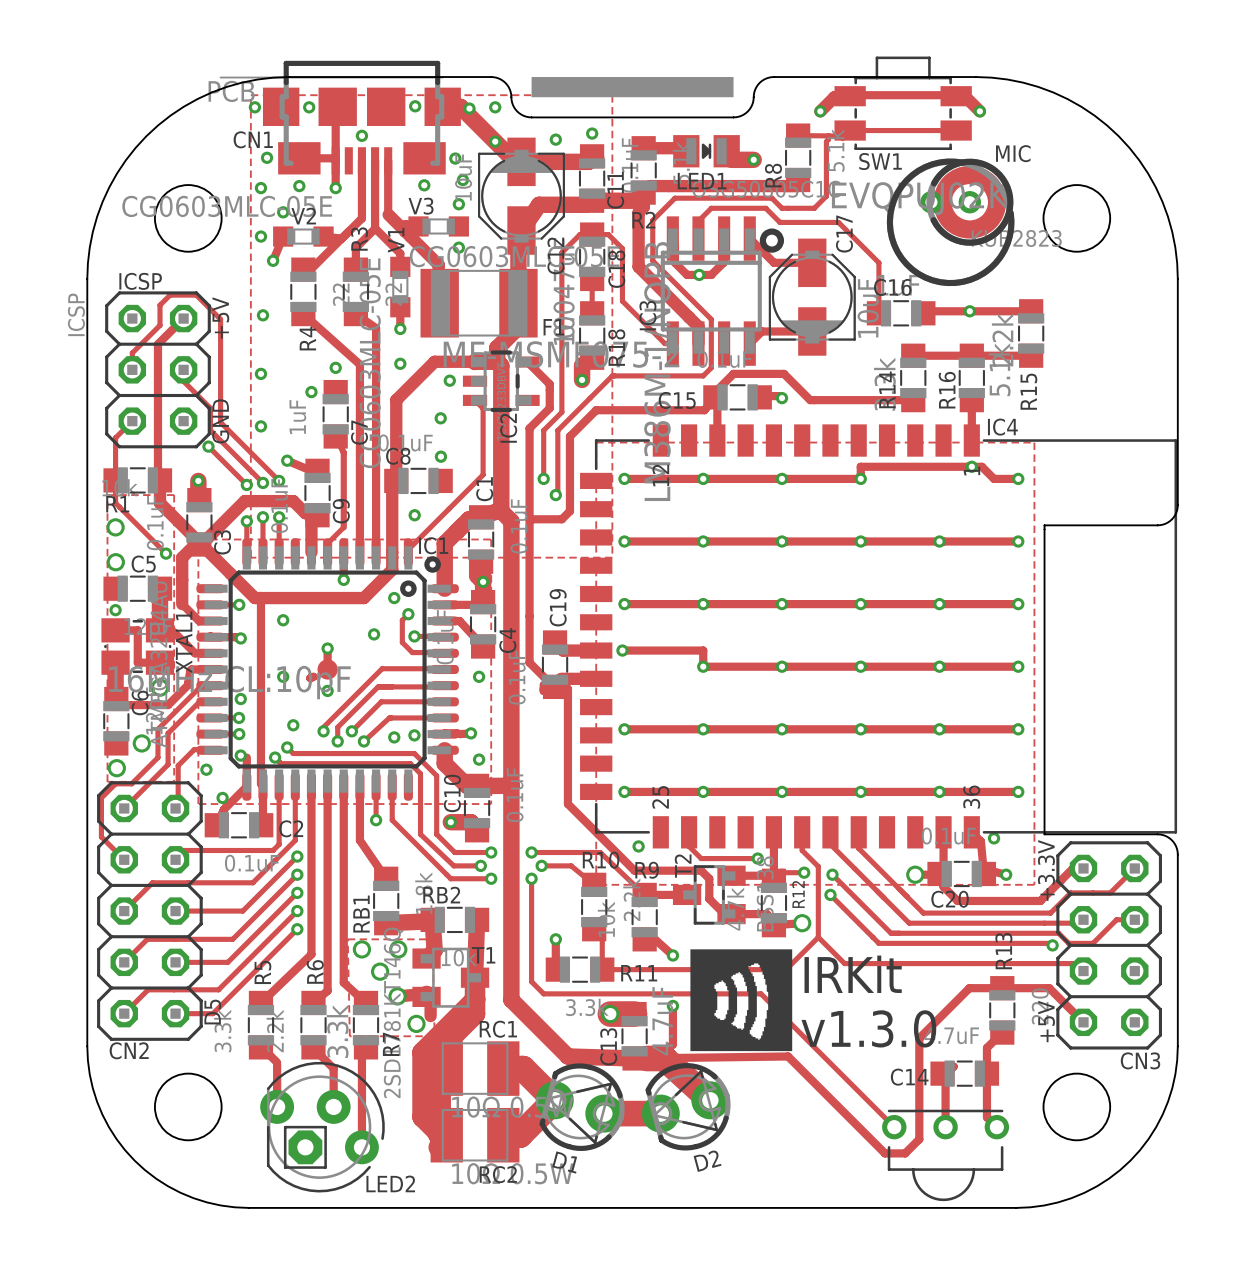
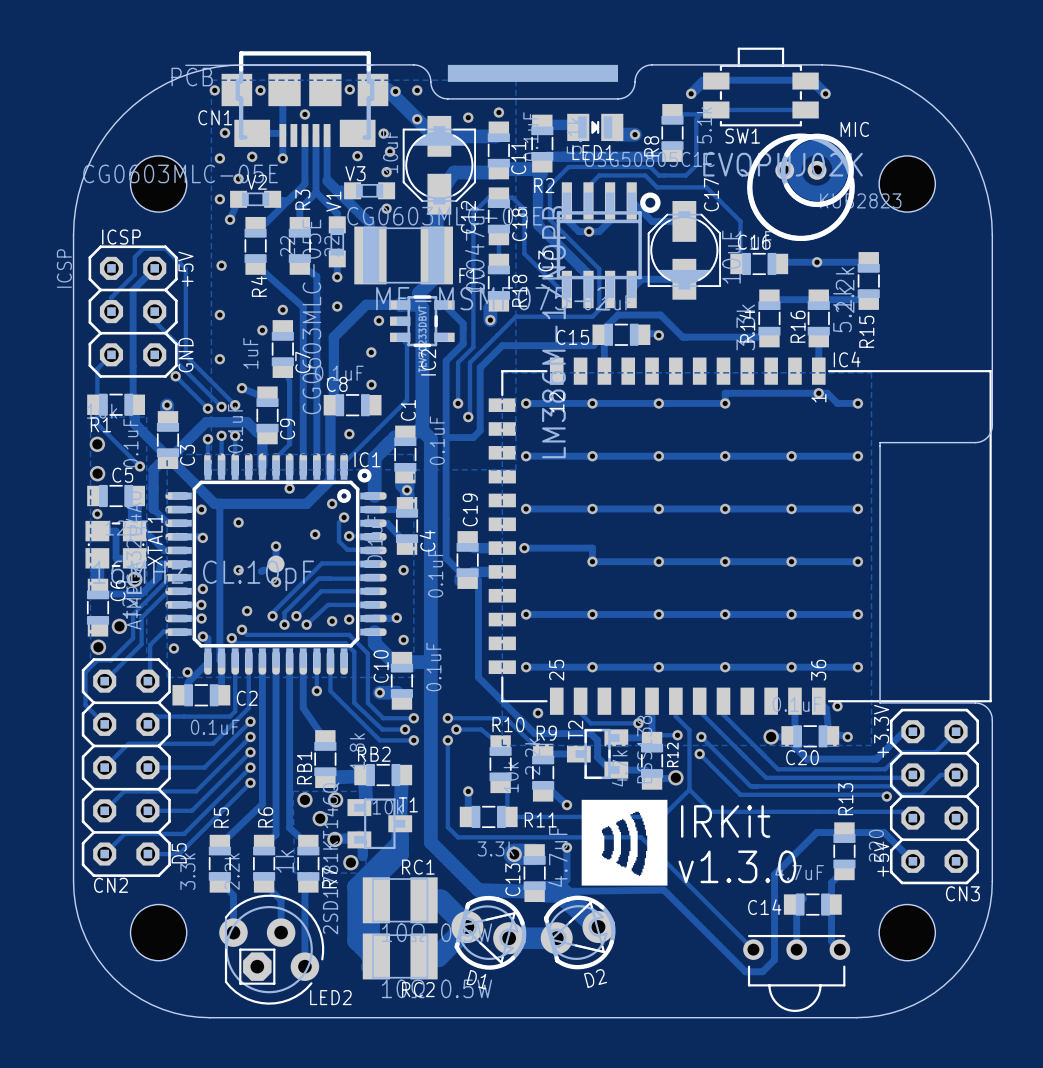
R7 value: 3.3k (337, 1031) -> 1k (284, 861)

